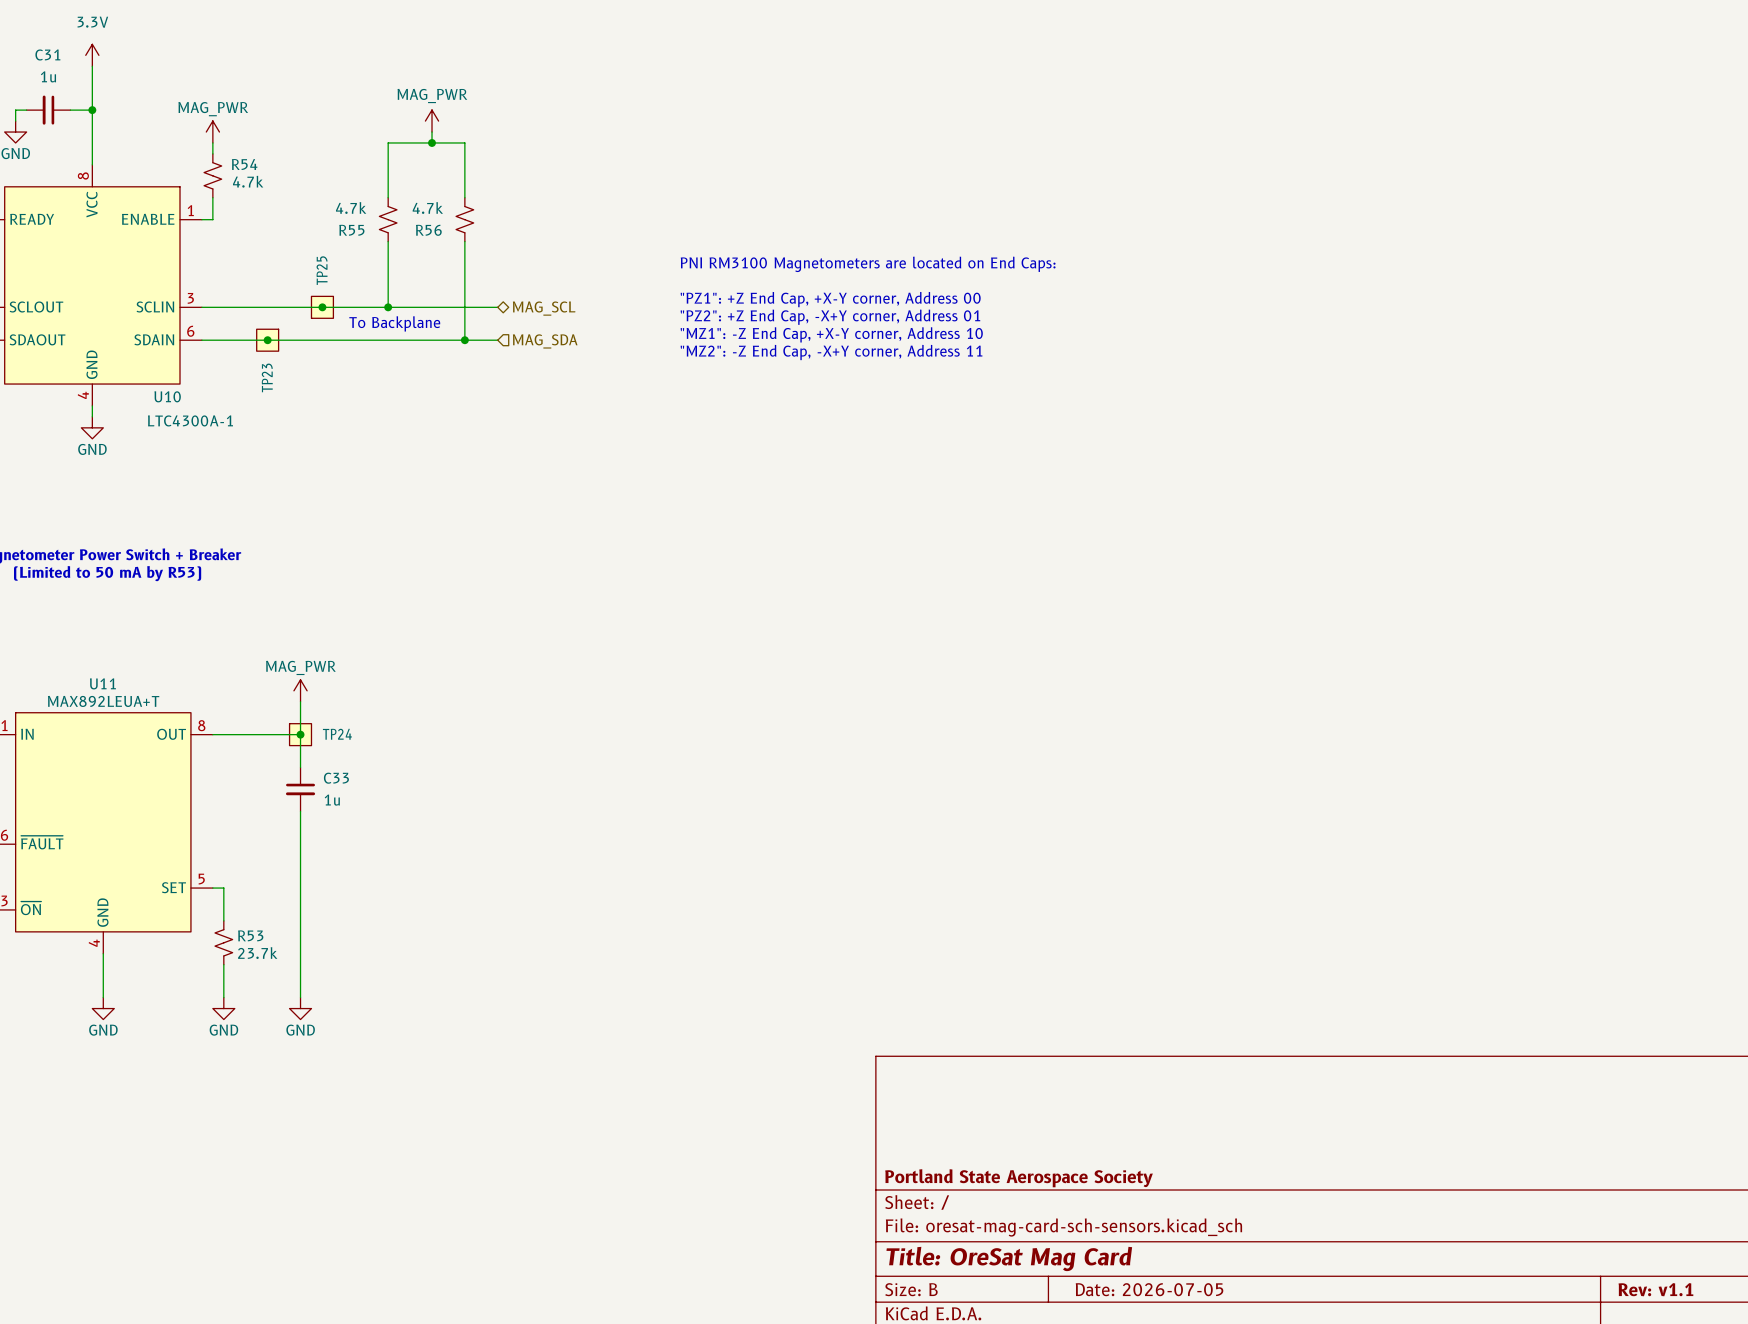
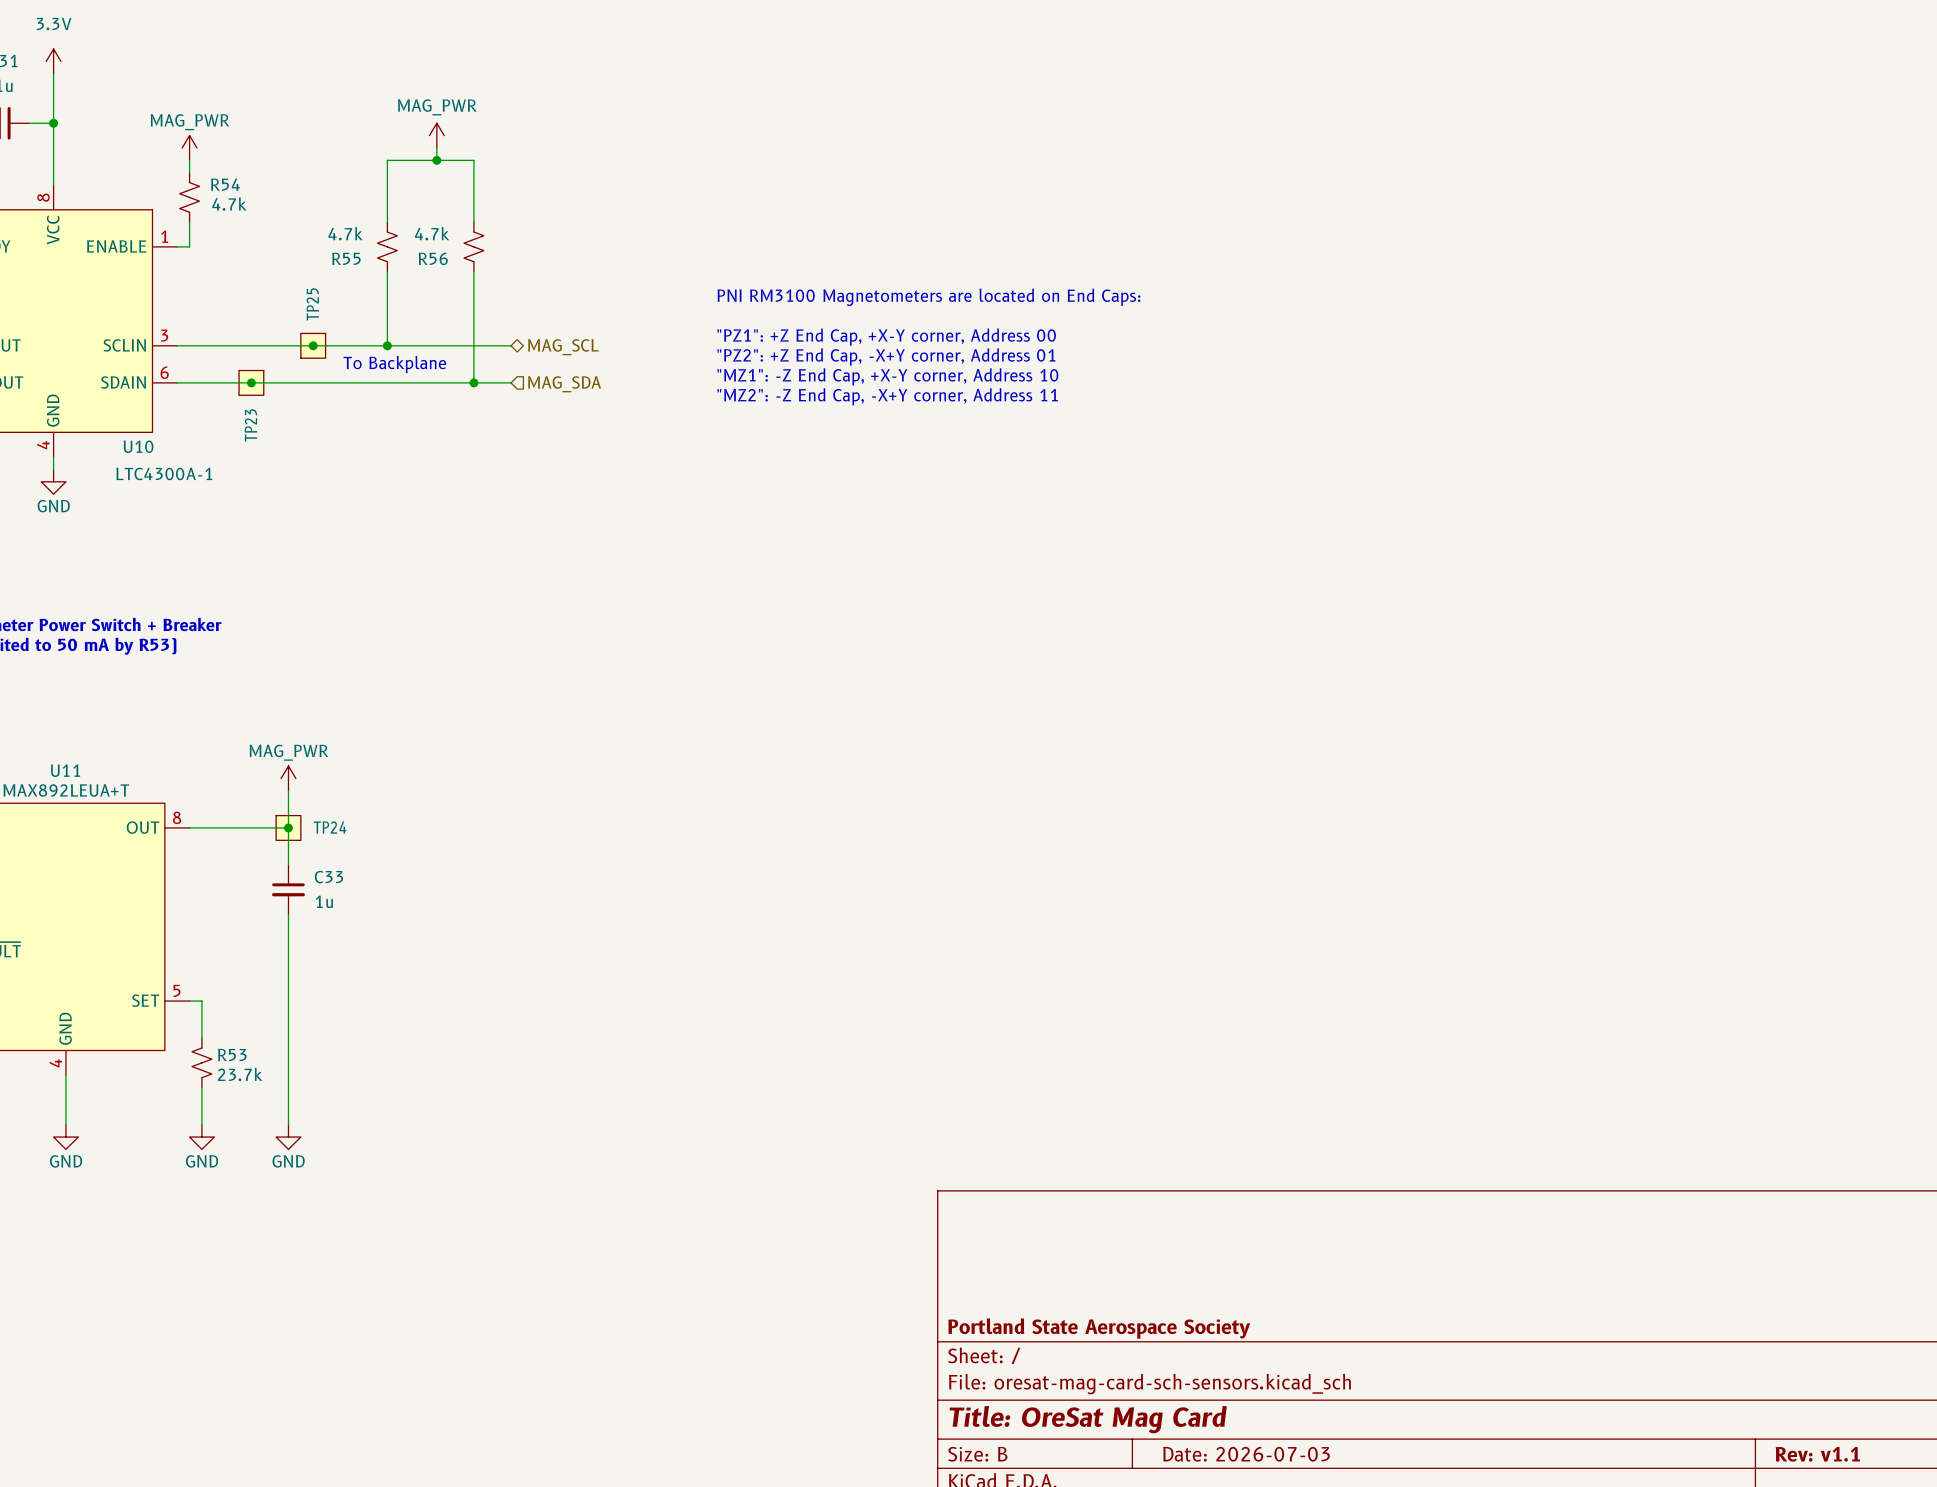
title block: Date: 2026-07-05 (1149, 1289) -> Date: 2026-07-03 (1246, 1454)

